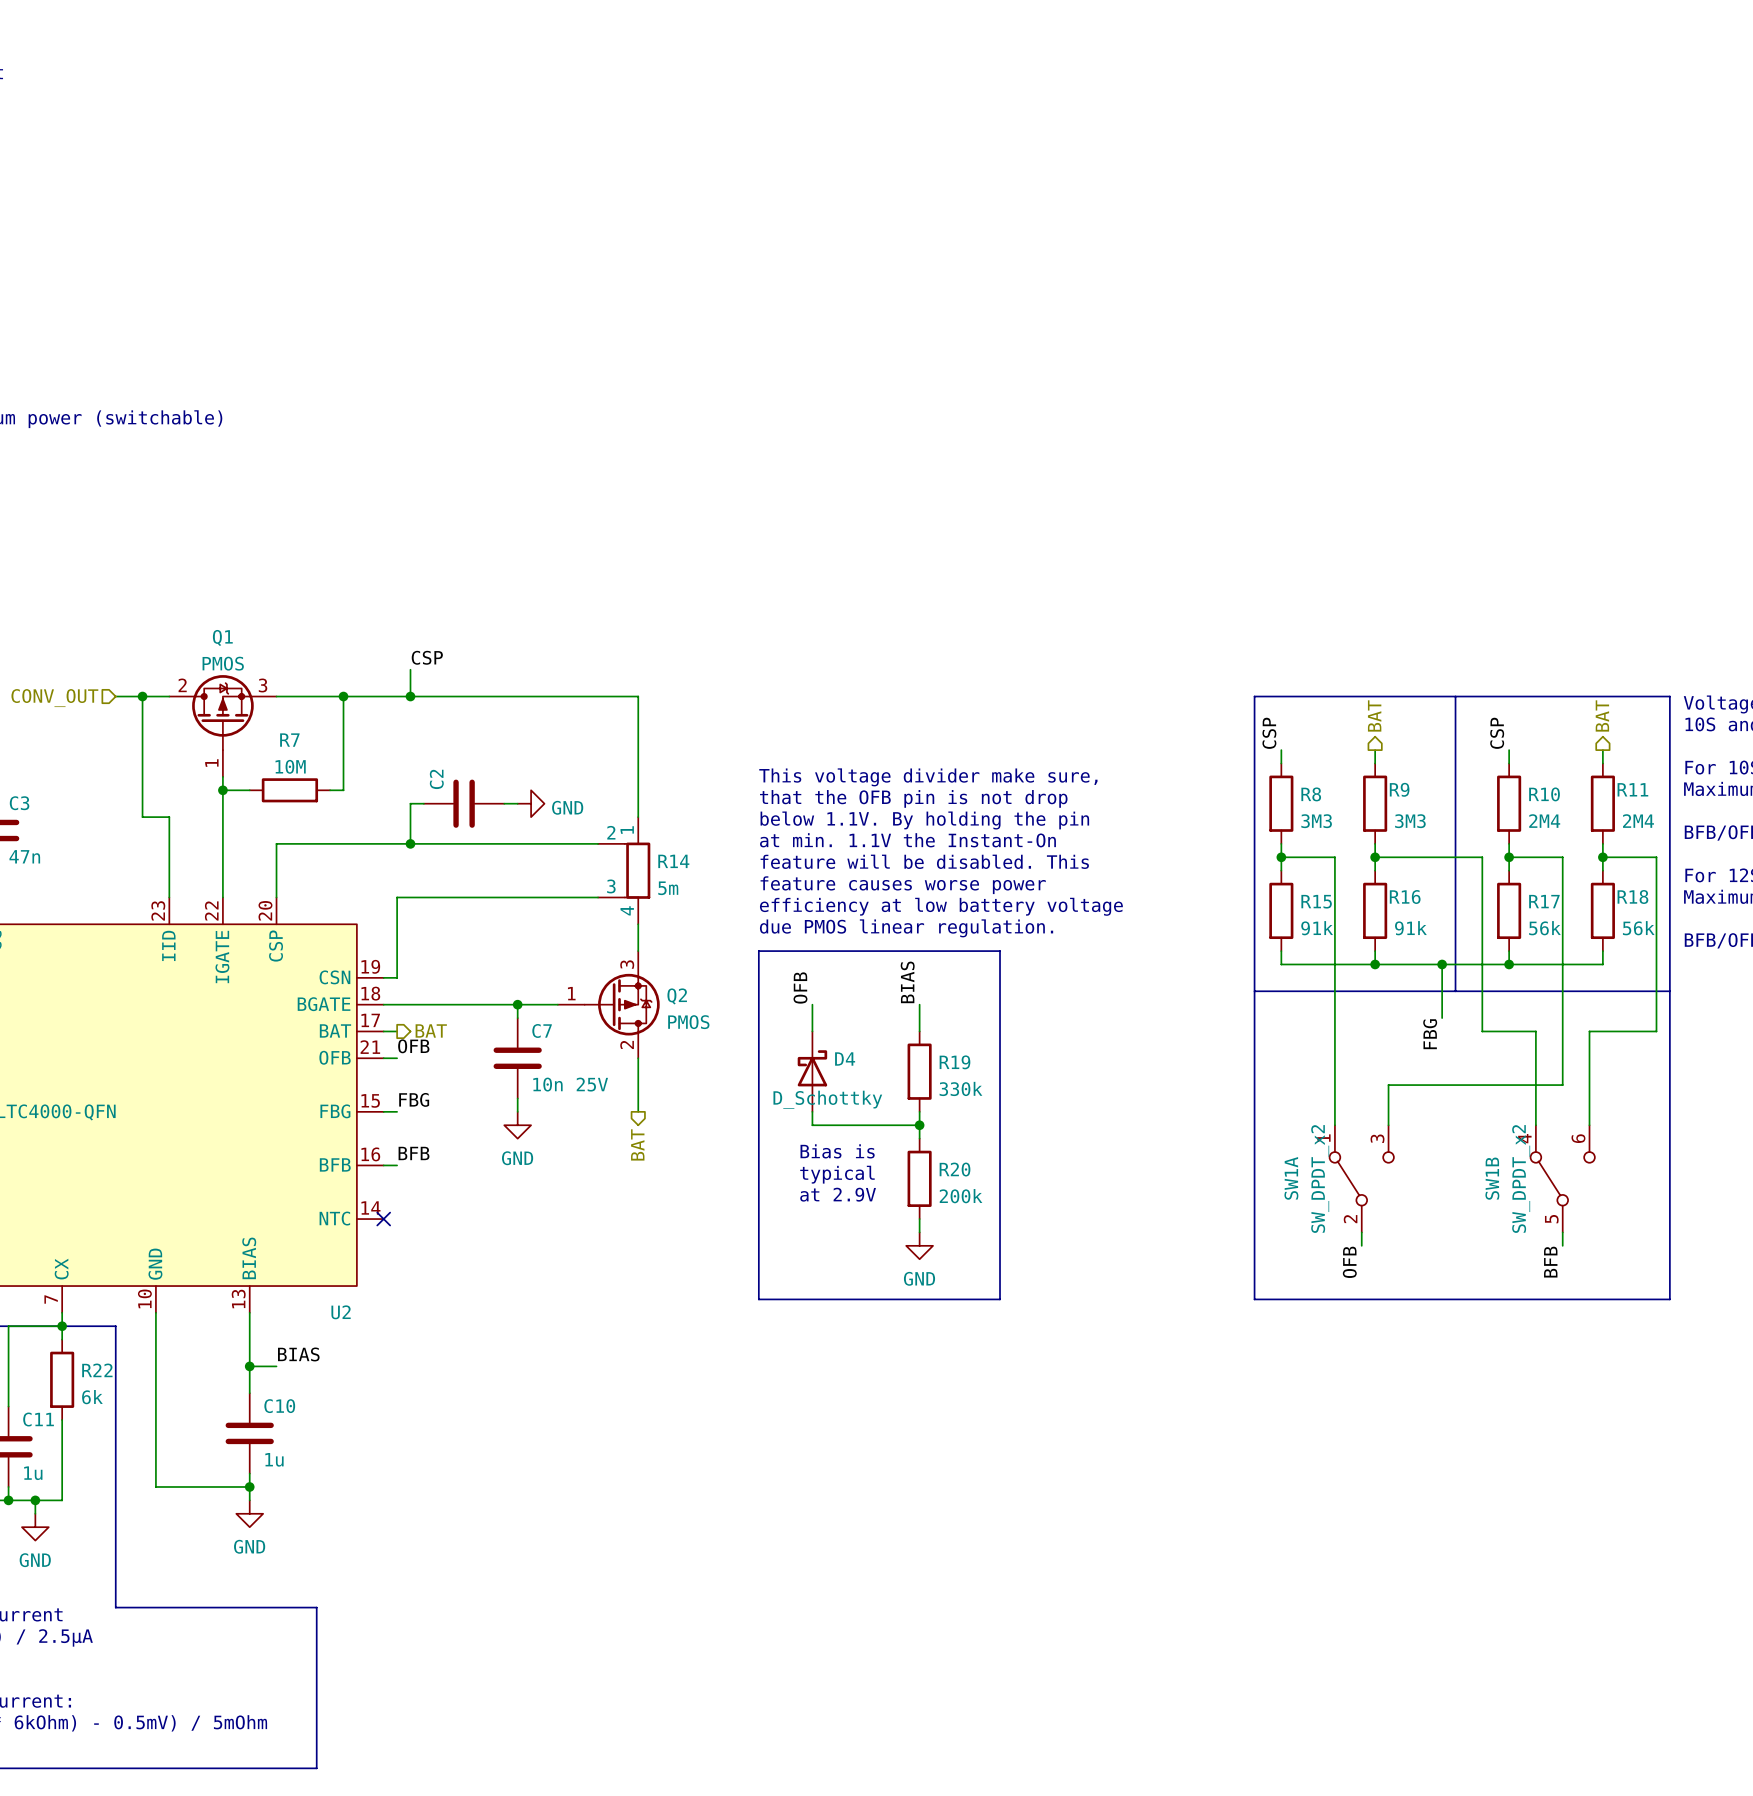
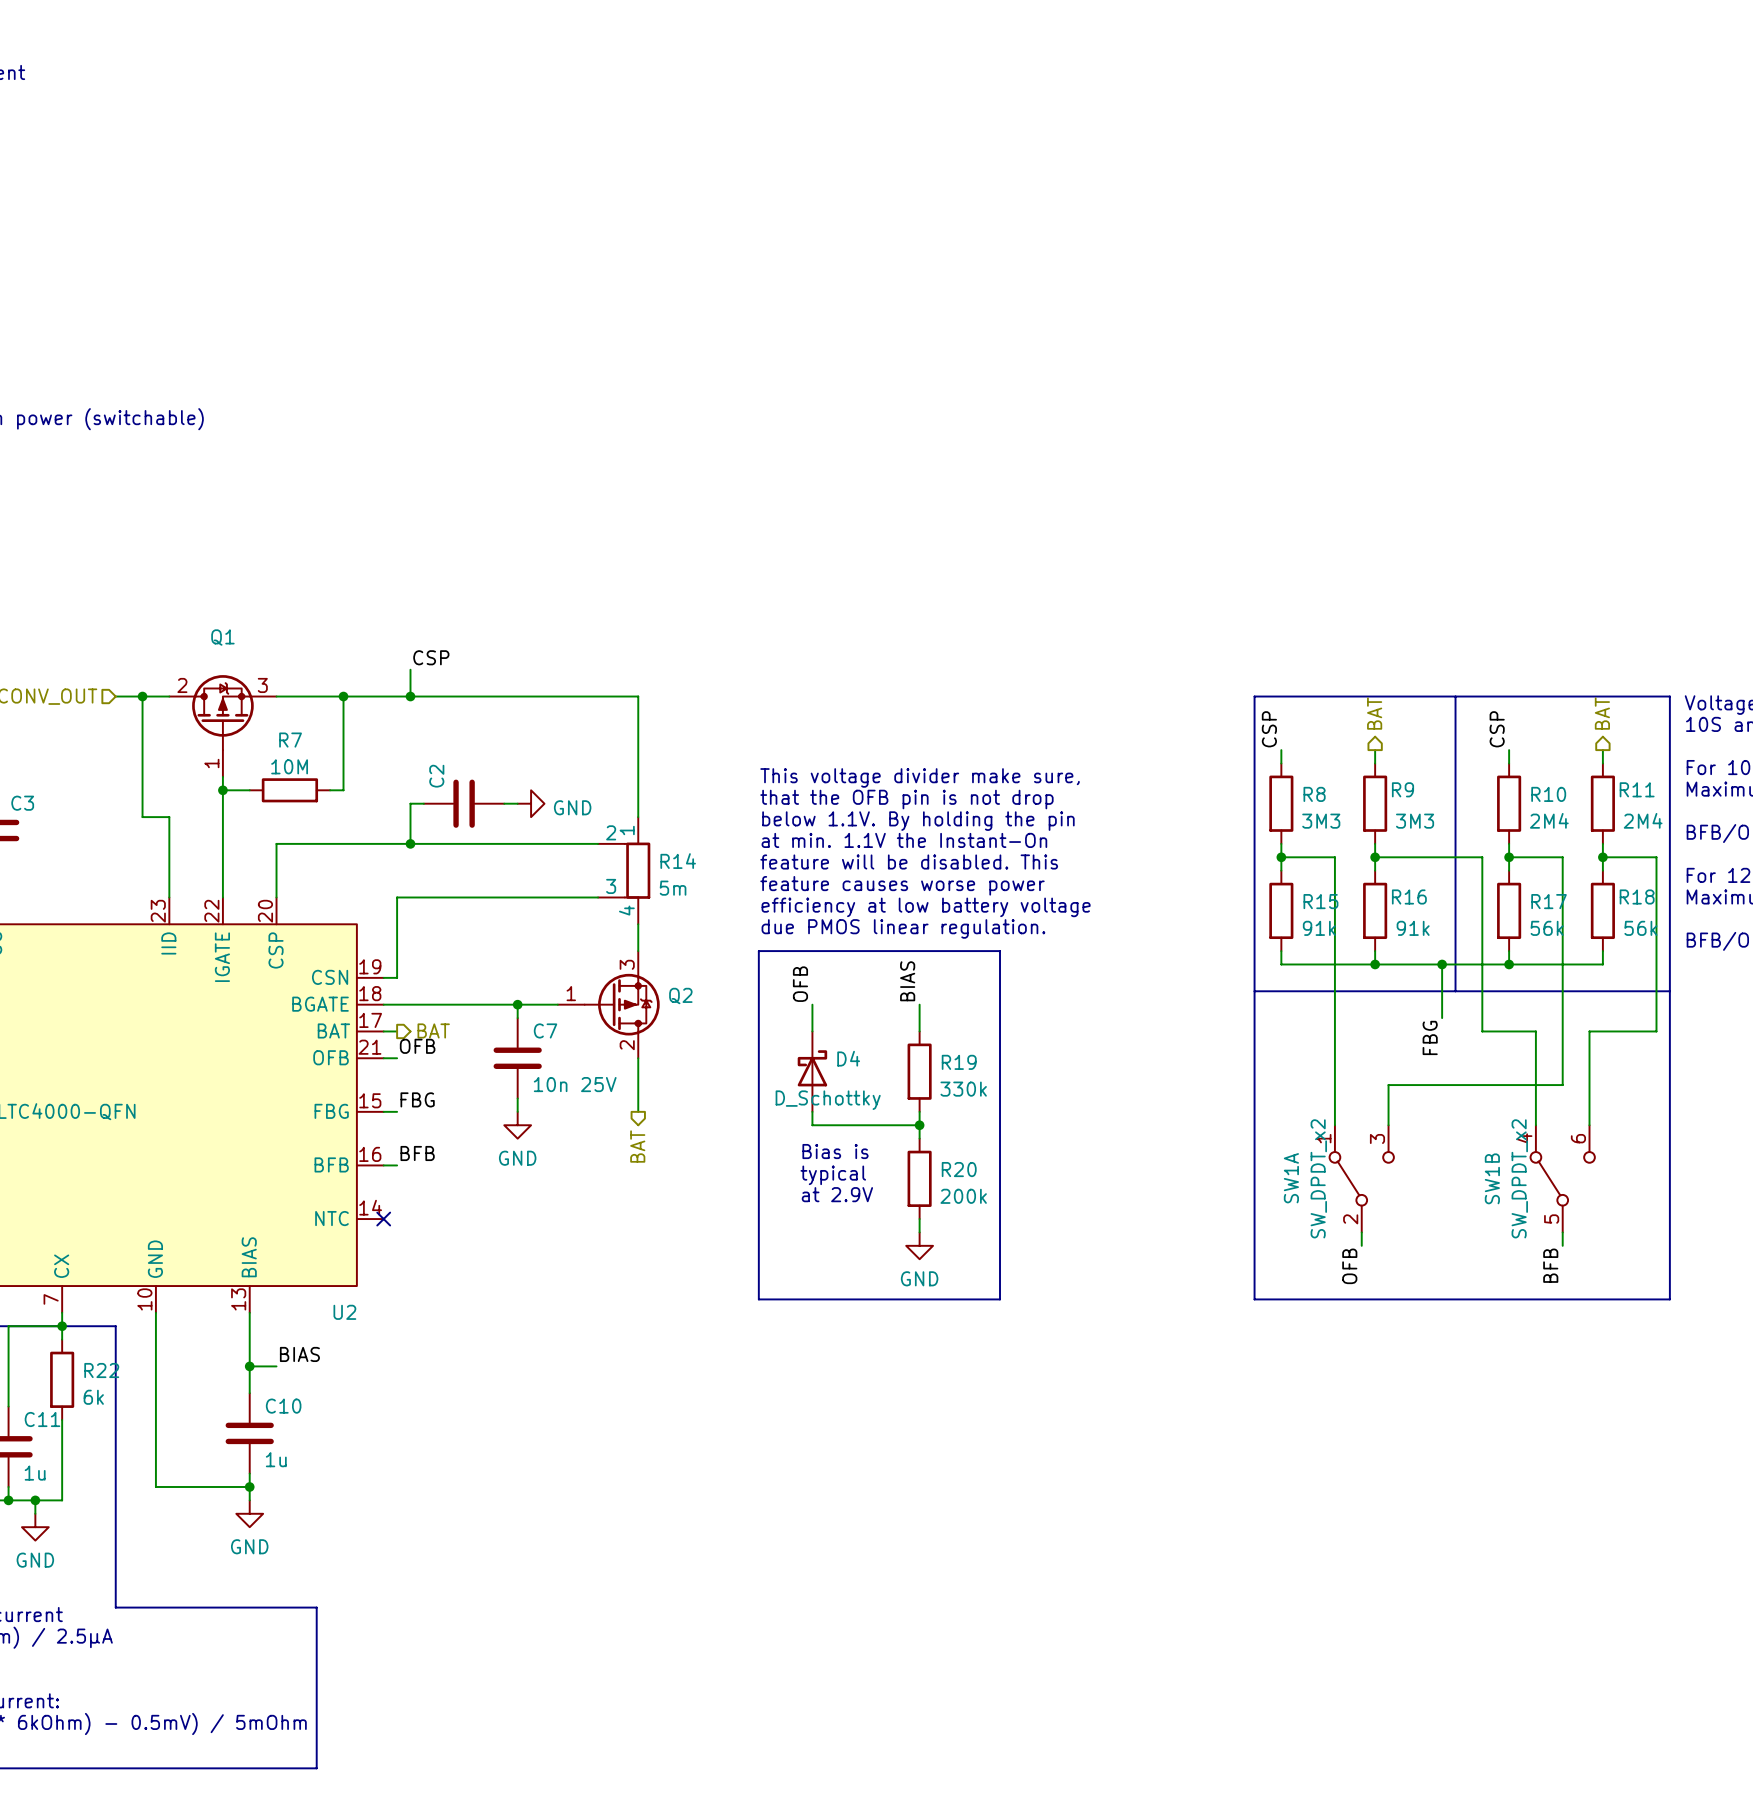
Q1 value: PMOS (223, 663) -> none
C3 value: 47n (24, 856) -> none
Q2 value: PMOS (688, 1022) -> none

